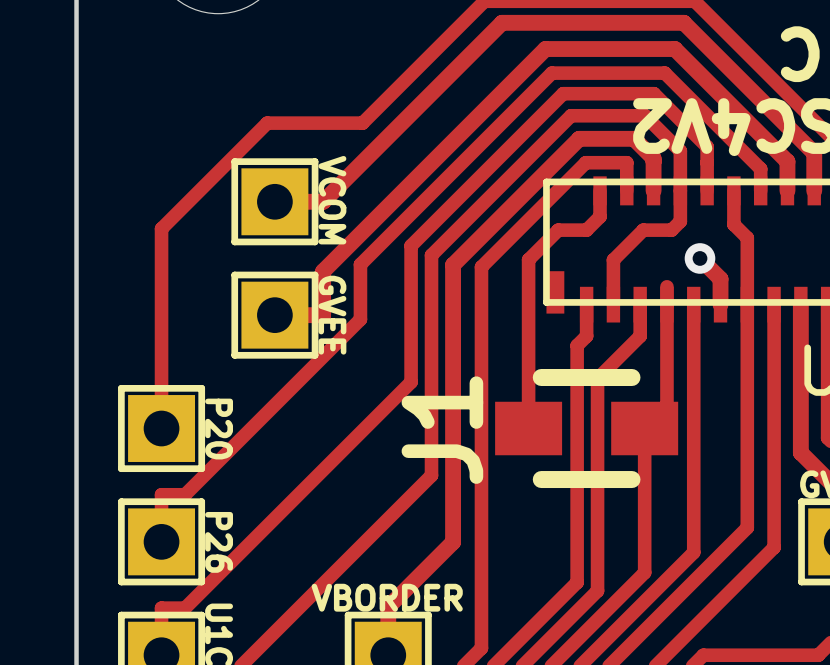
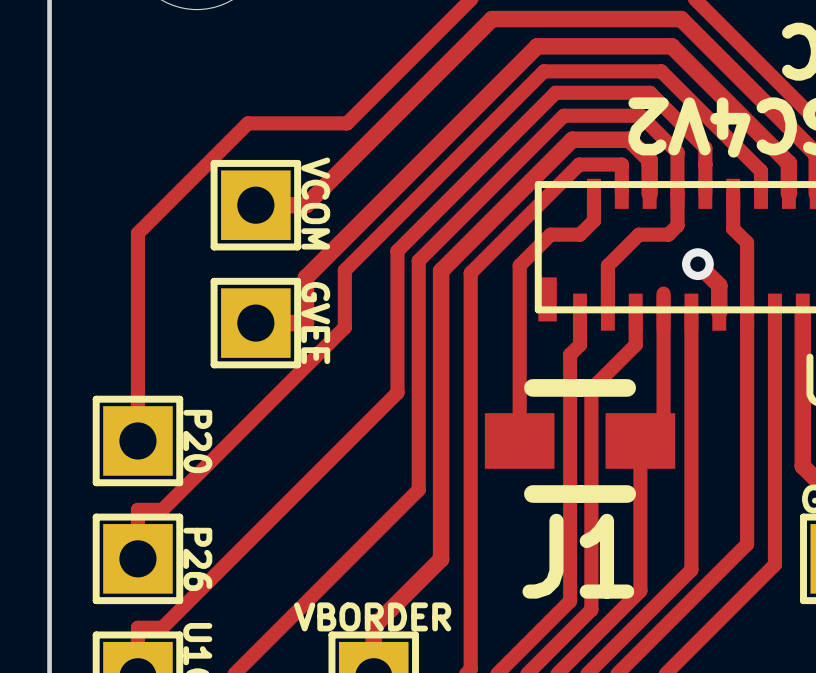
J1 name rotation: 0° (442, 430) -> 90° clockwise (578, 556)
J1 name position: J1 (442, 430) -> J1 (578, 556)

